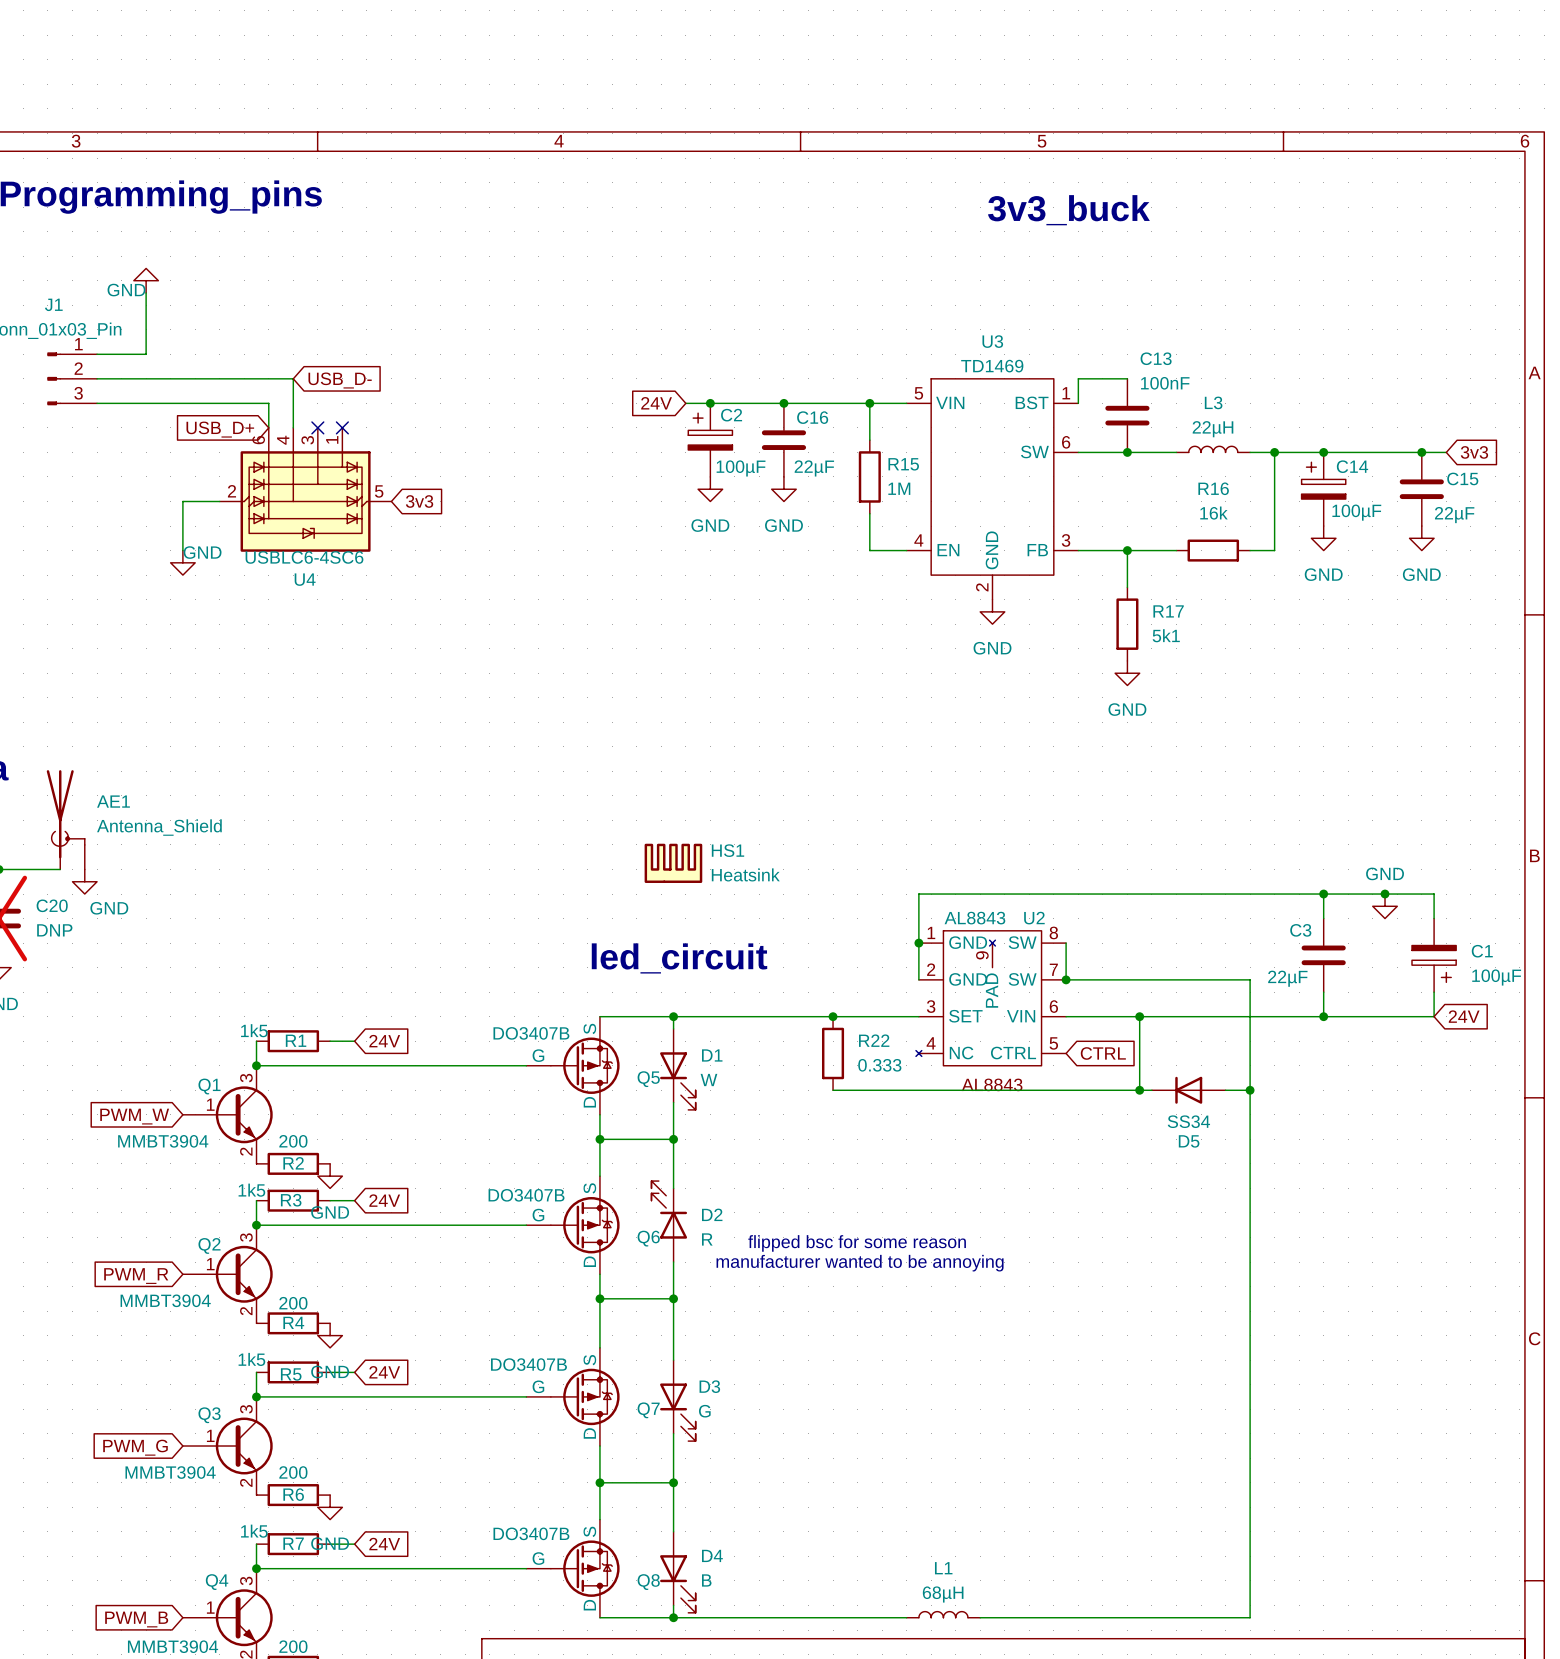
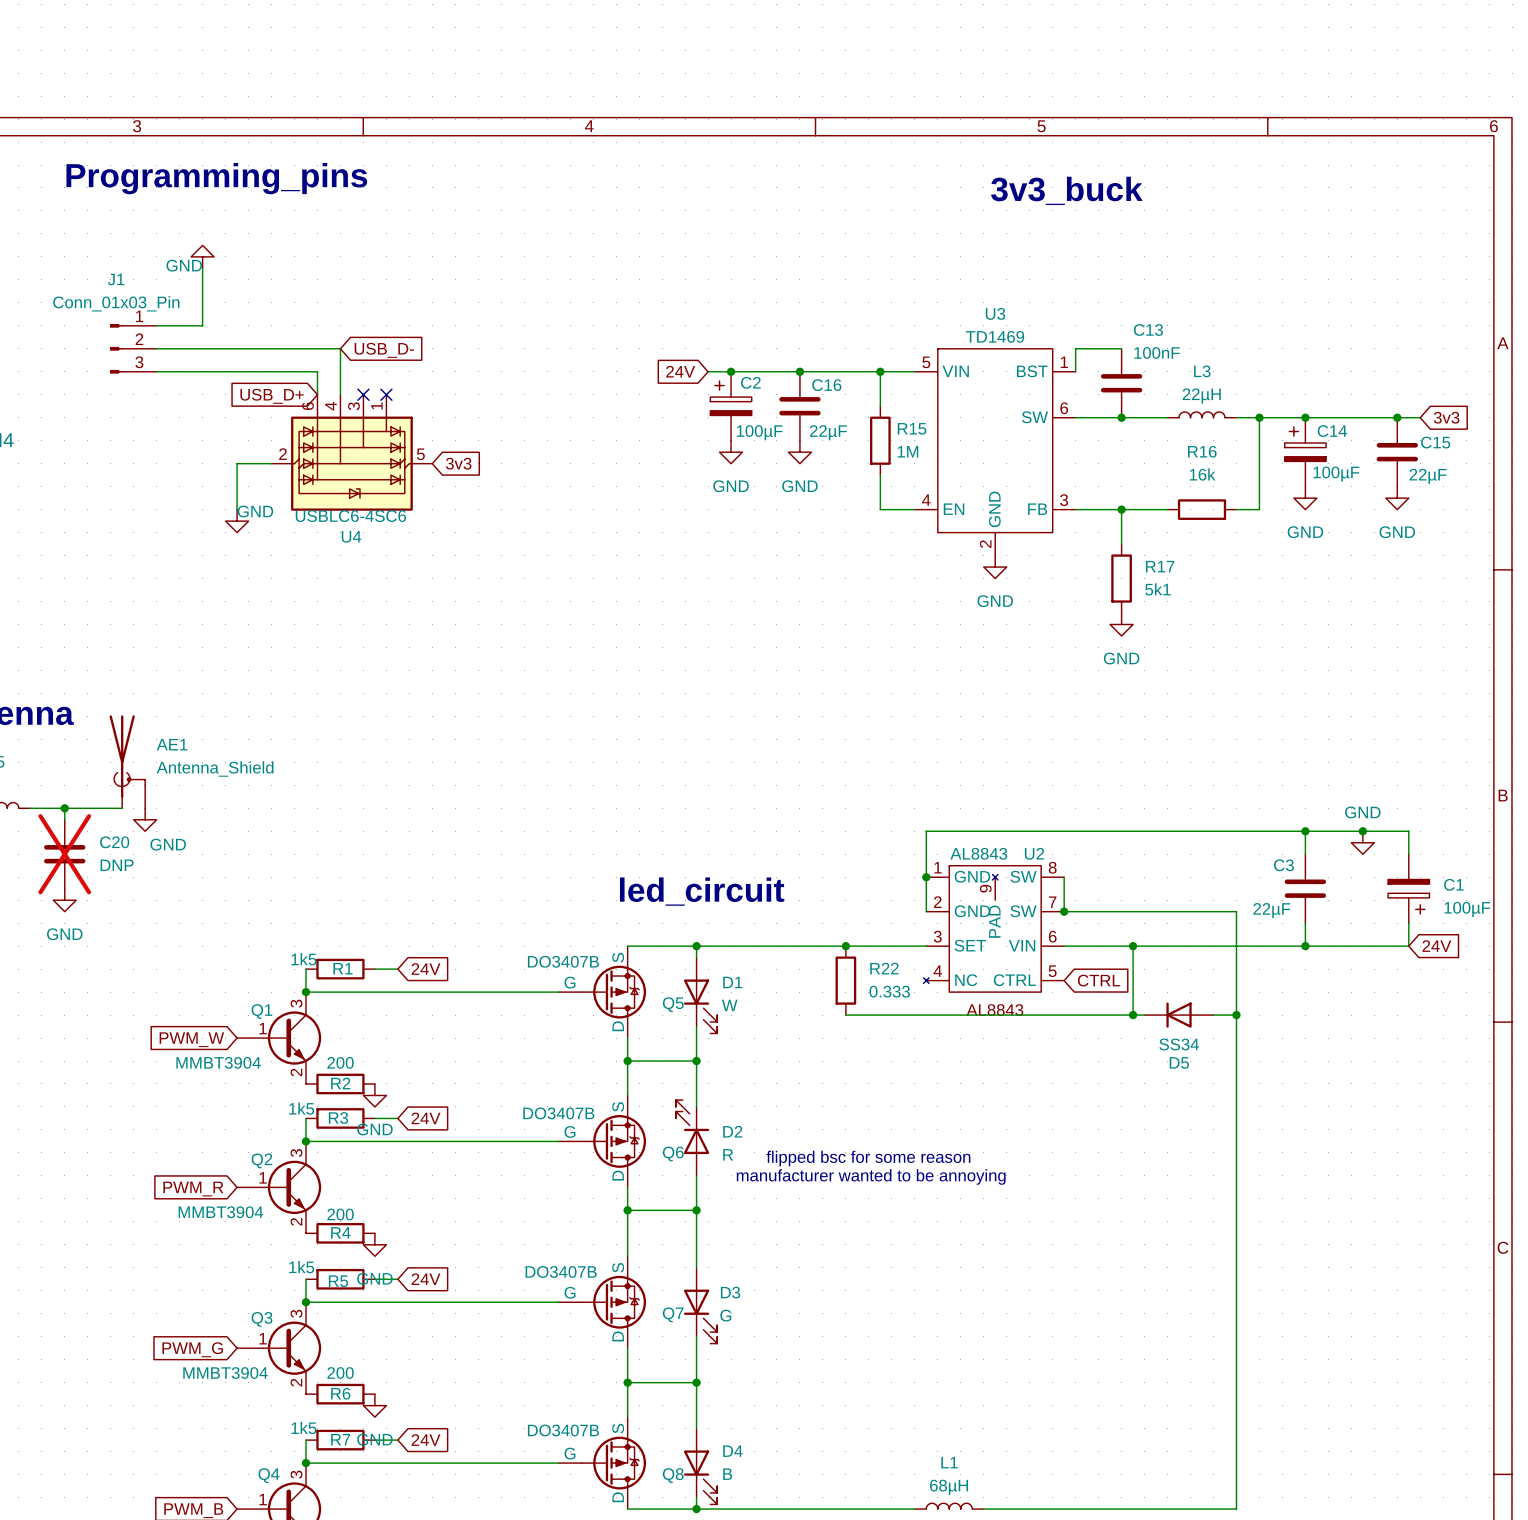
HS1: Heatsink (673, 863) -> none

